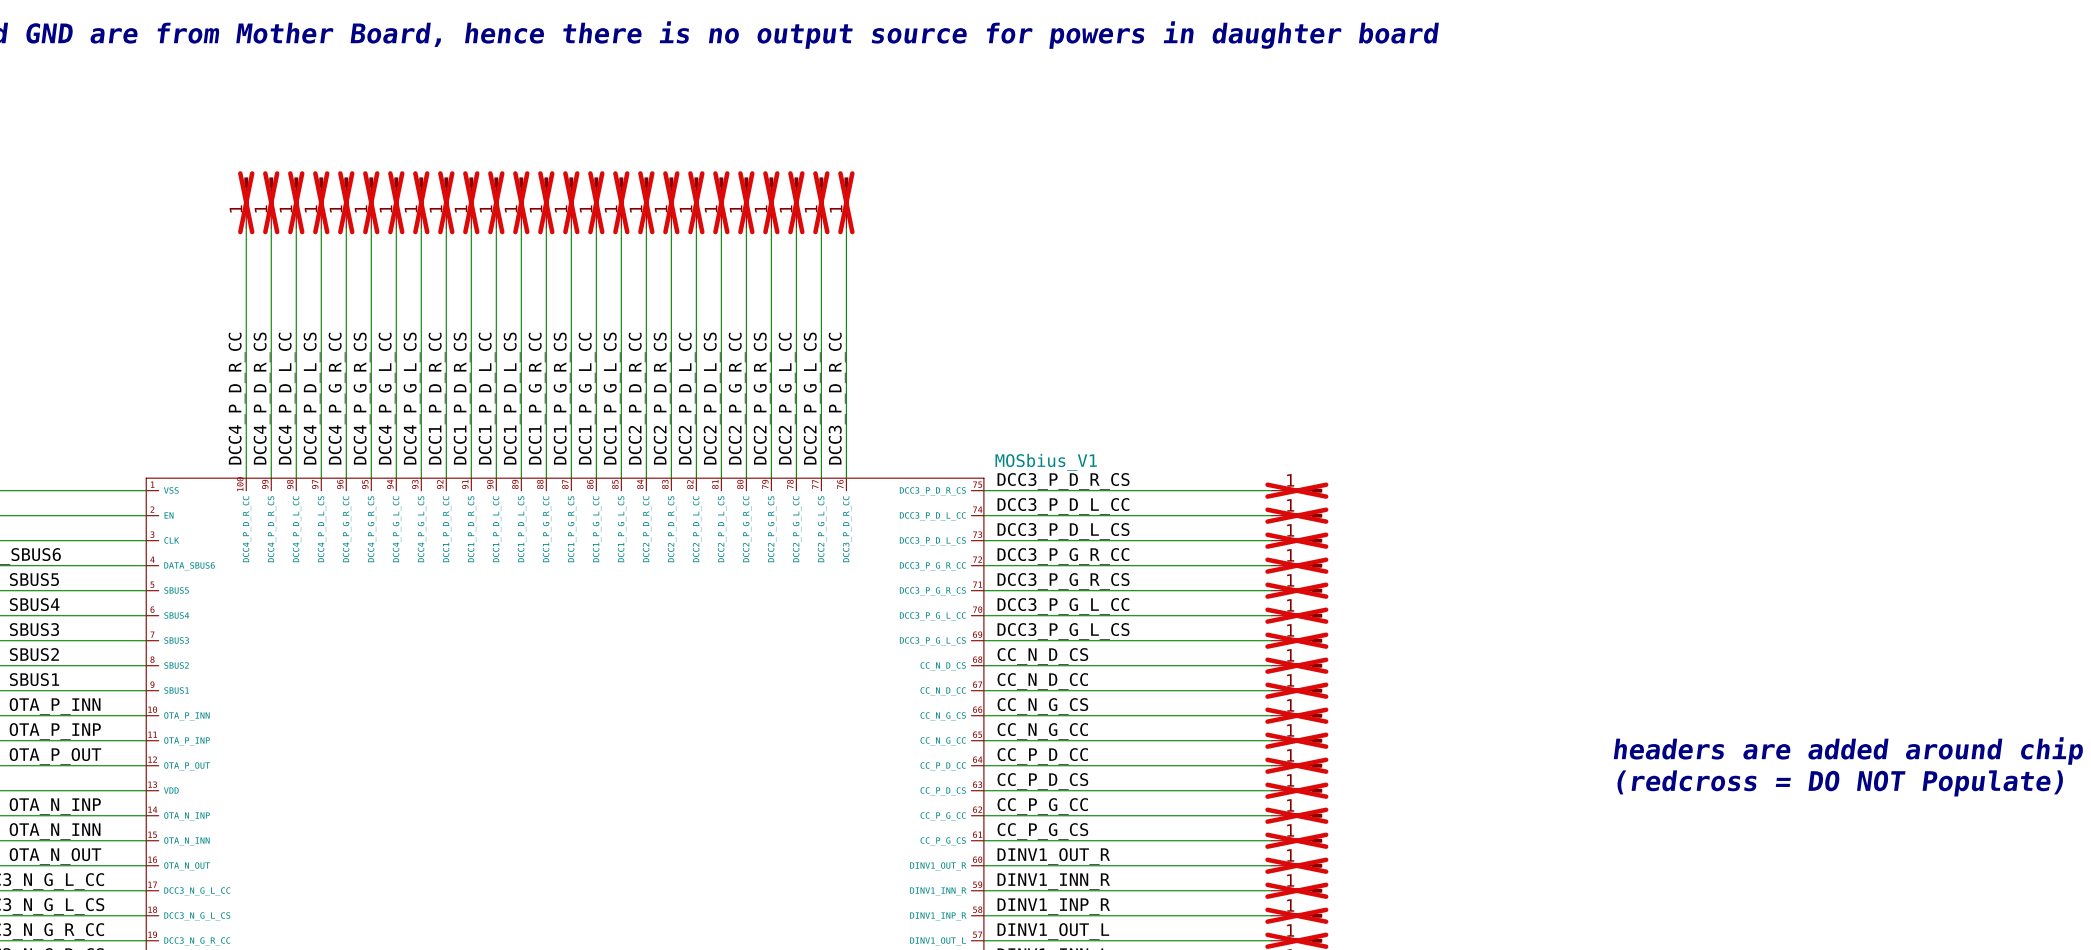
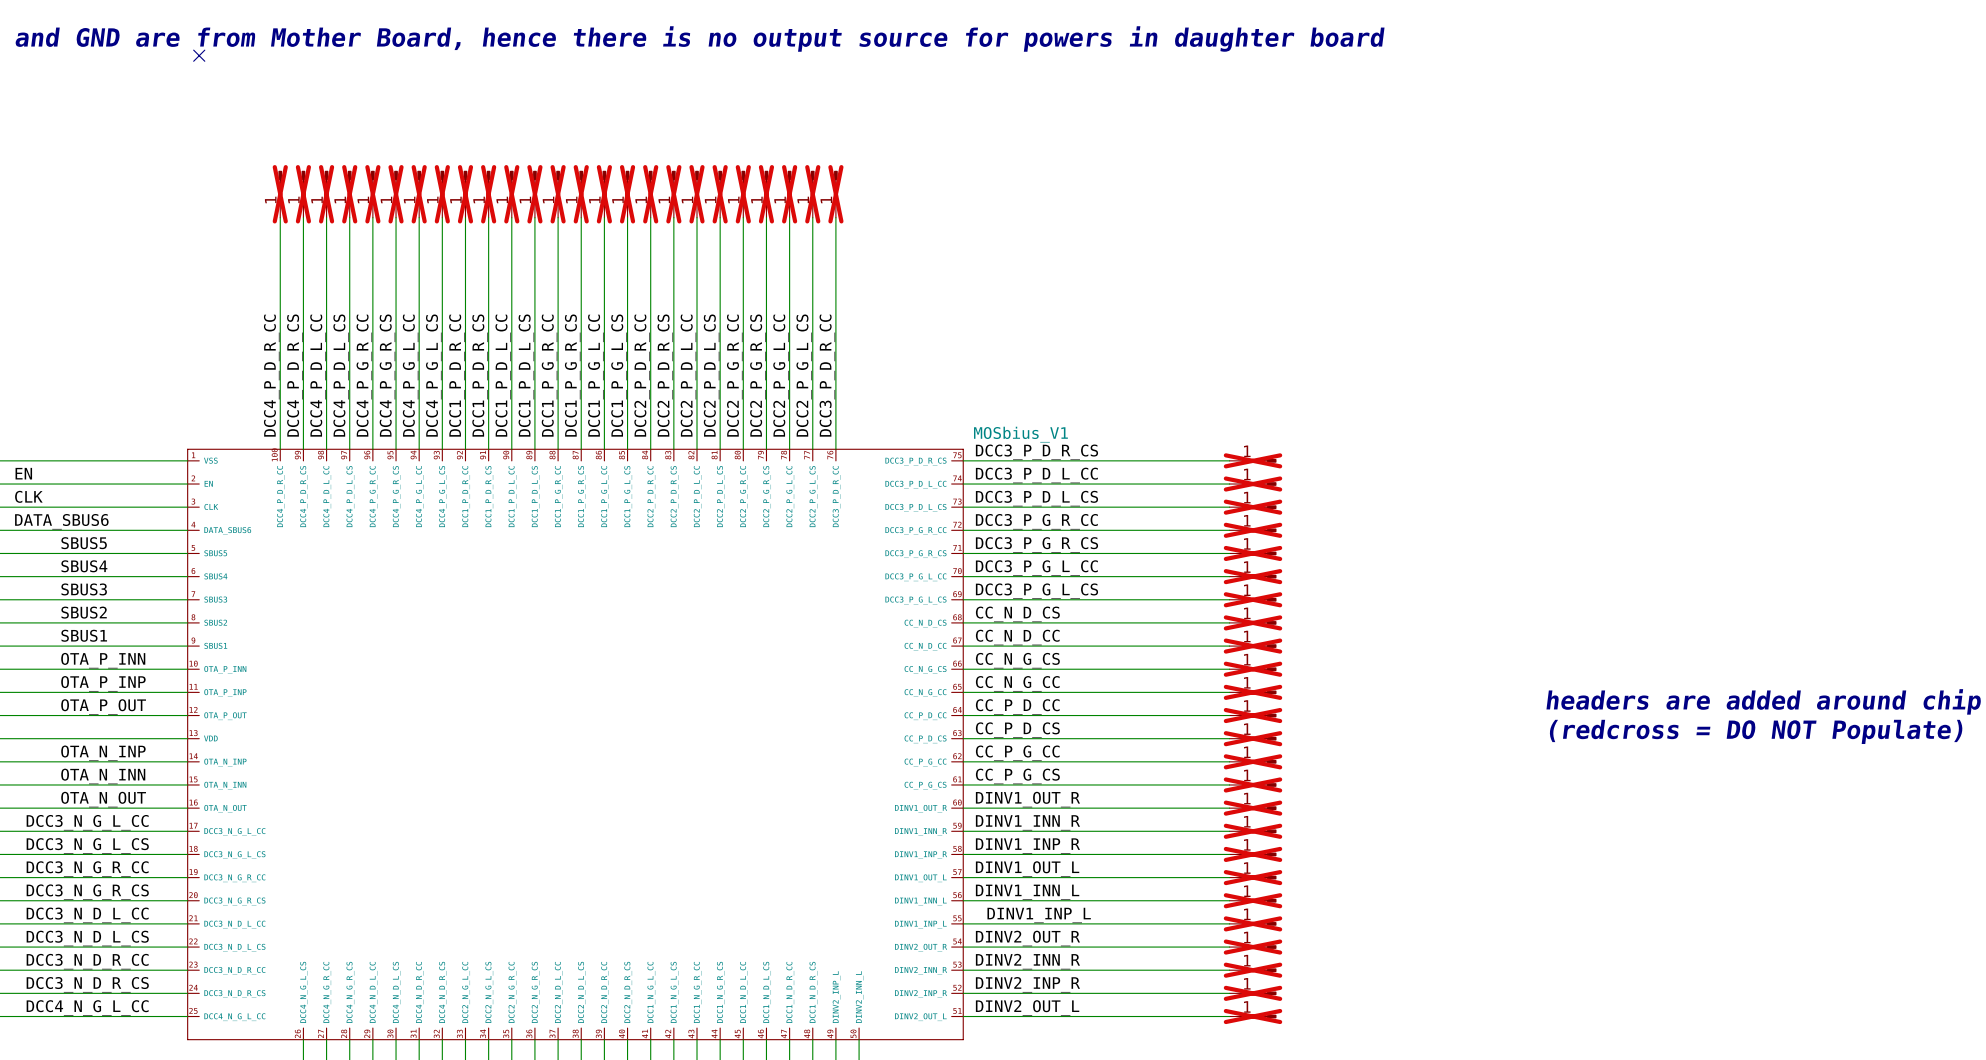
no-connect mark: none -> (199, 55)

